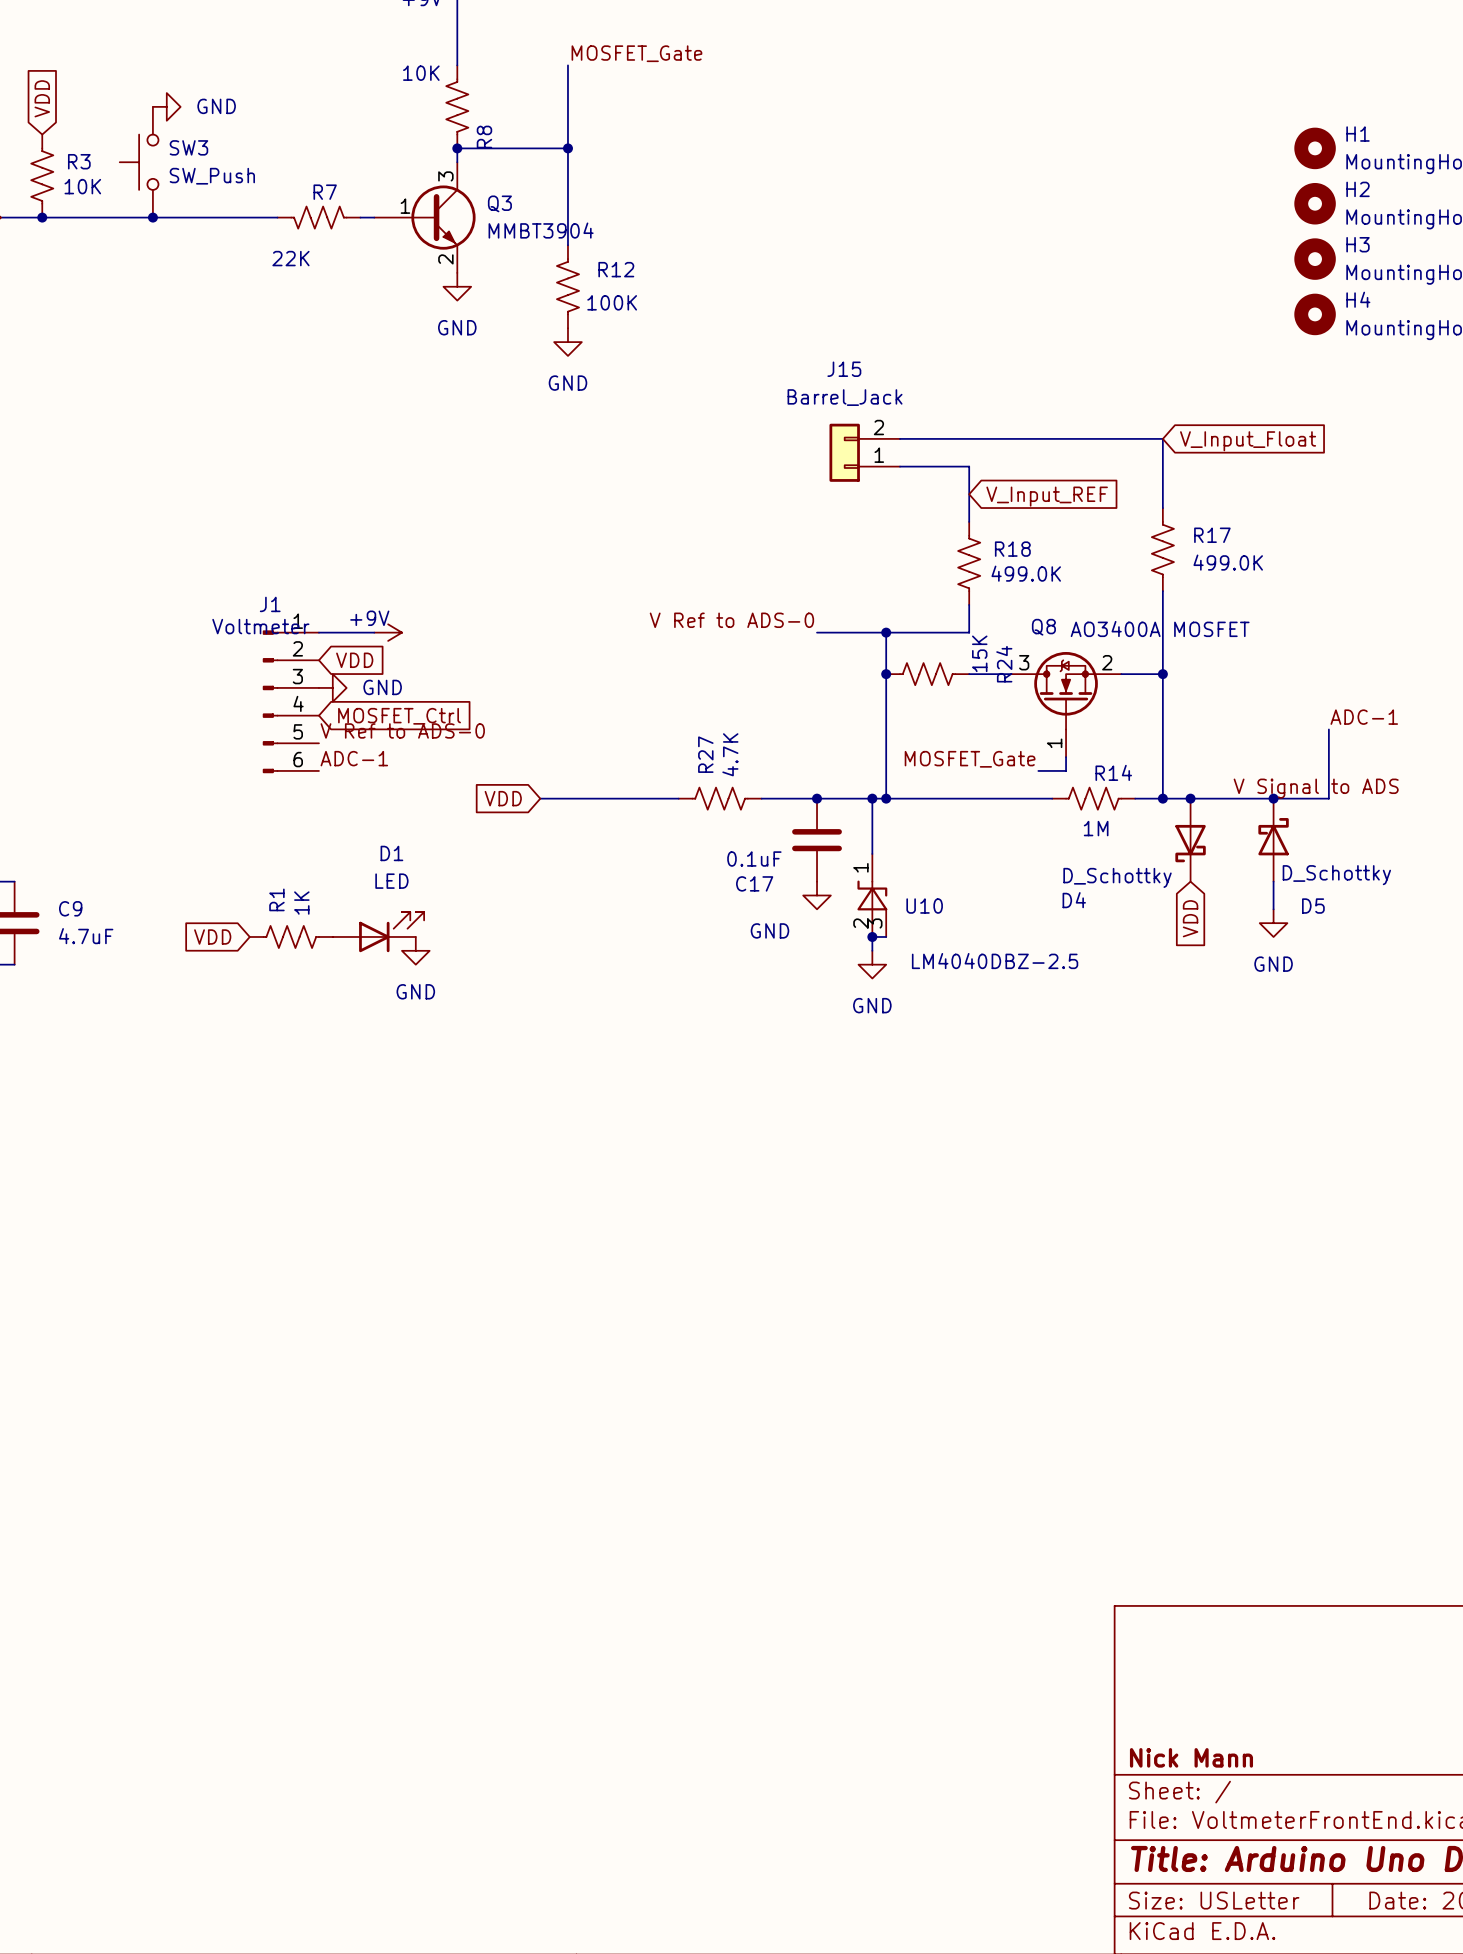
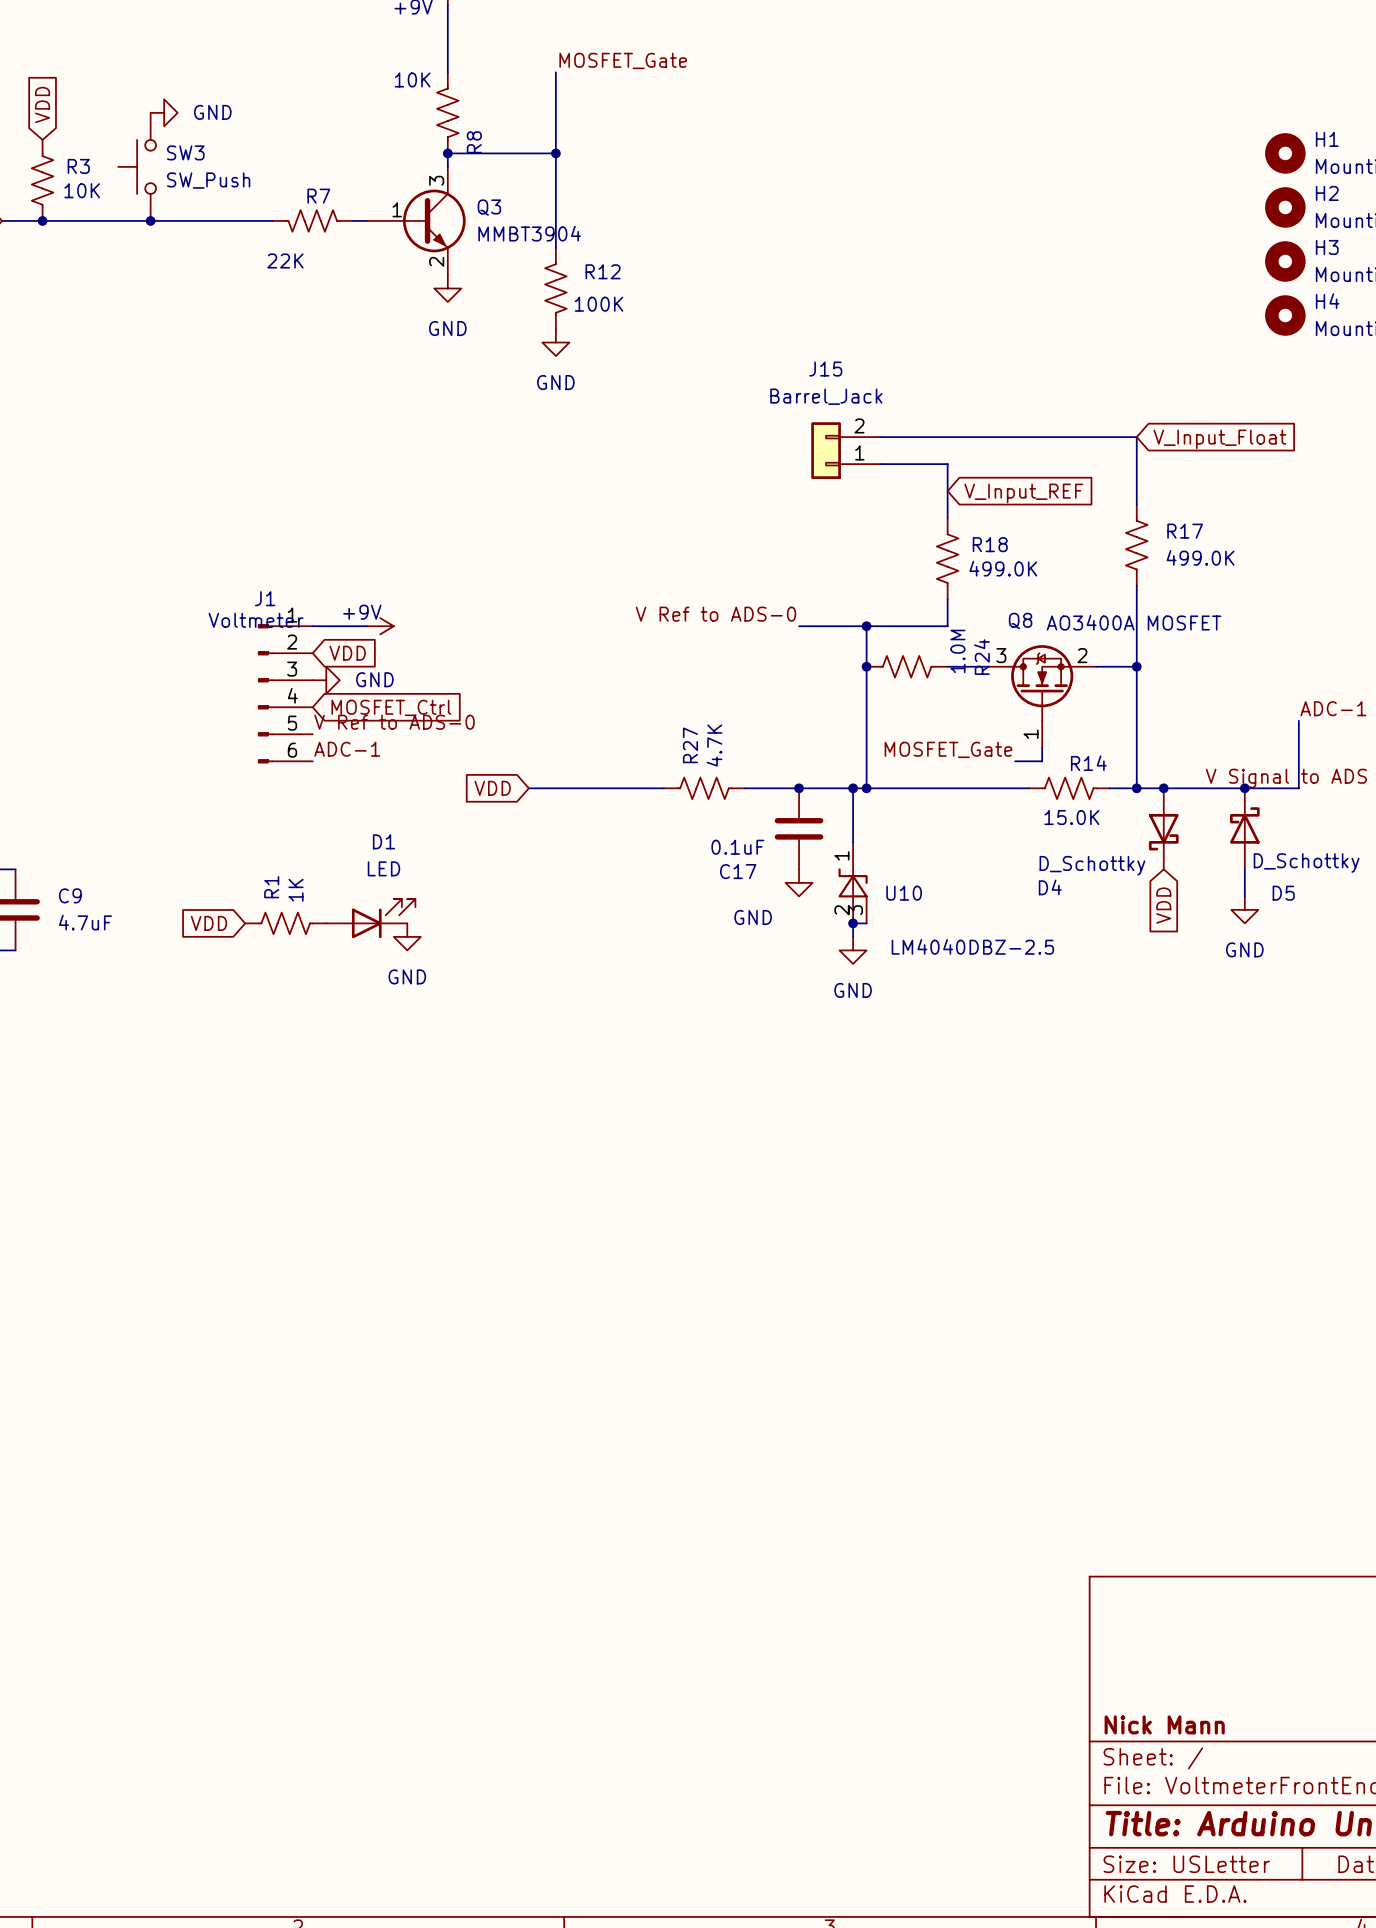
R24 value: 15K (979, 653) -> 1.0M (957, 651)
R14 value: 1M (1096, 828) -> 15.0K (1071, 817)

